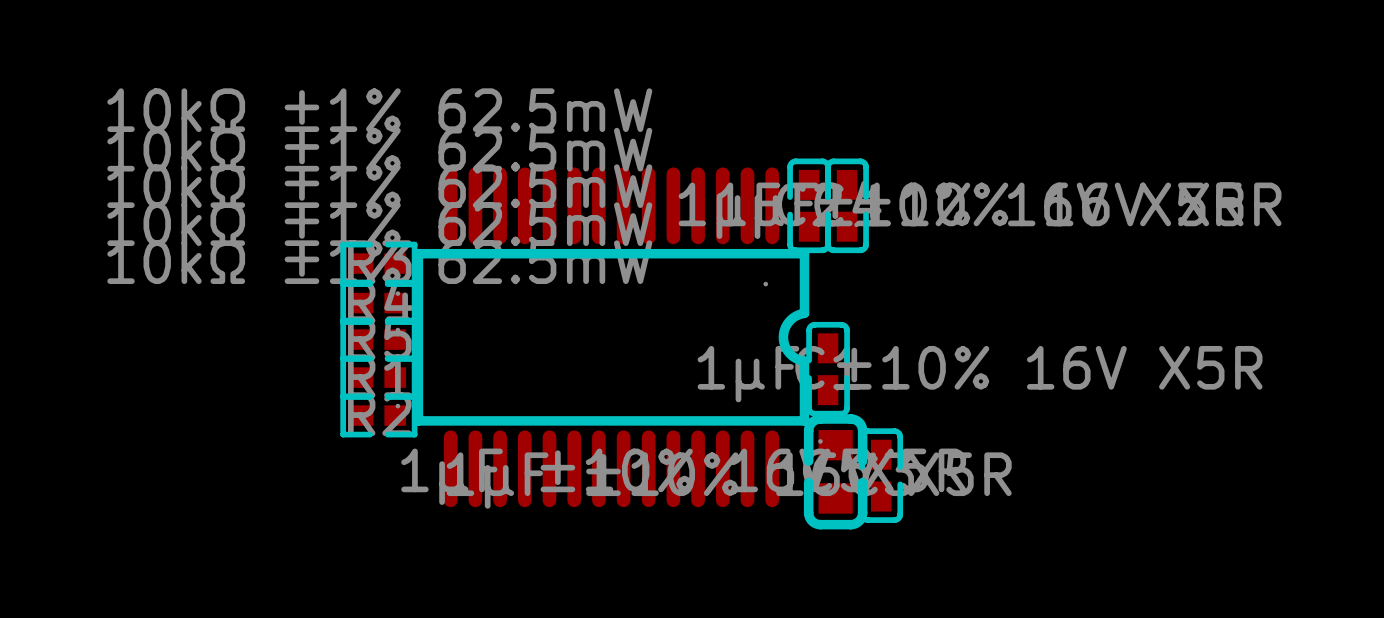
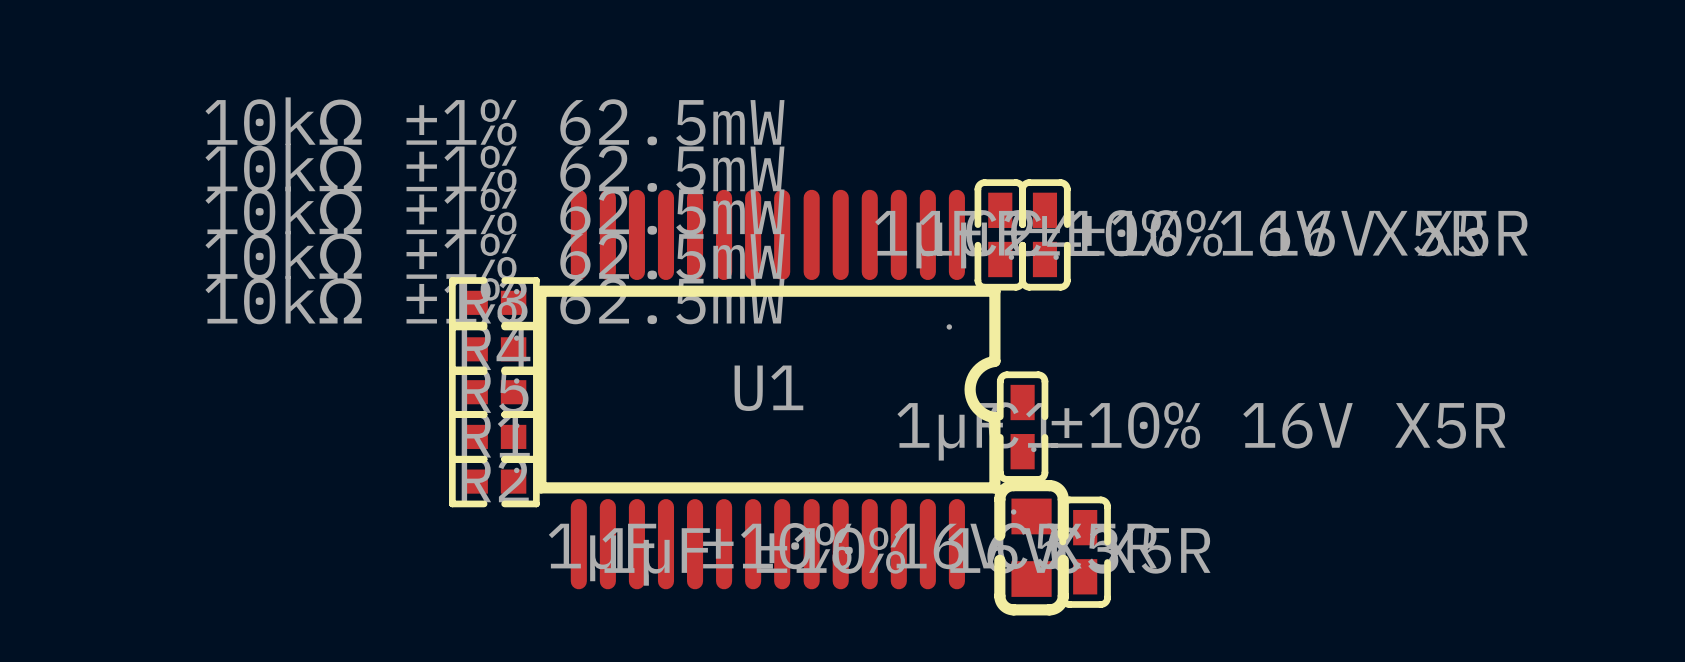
U1 name: none -> U1 (768, 388)

